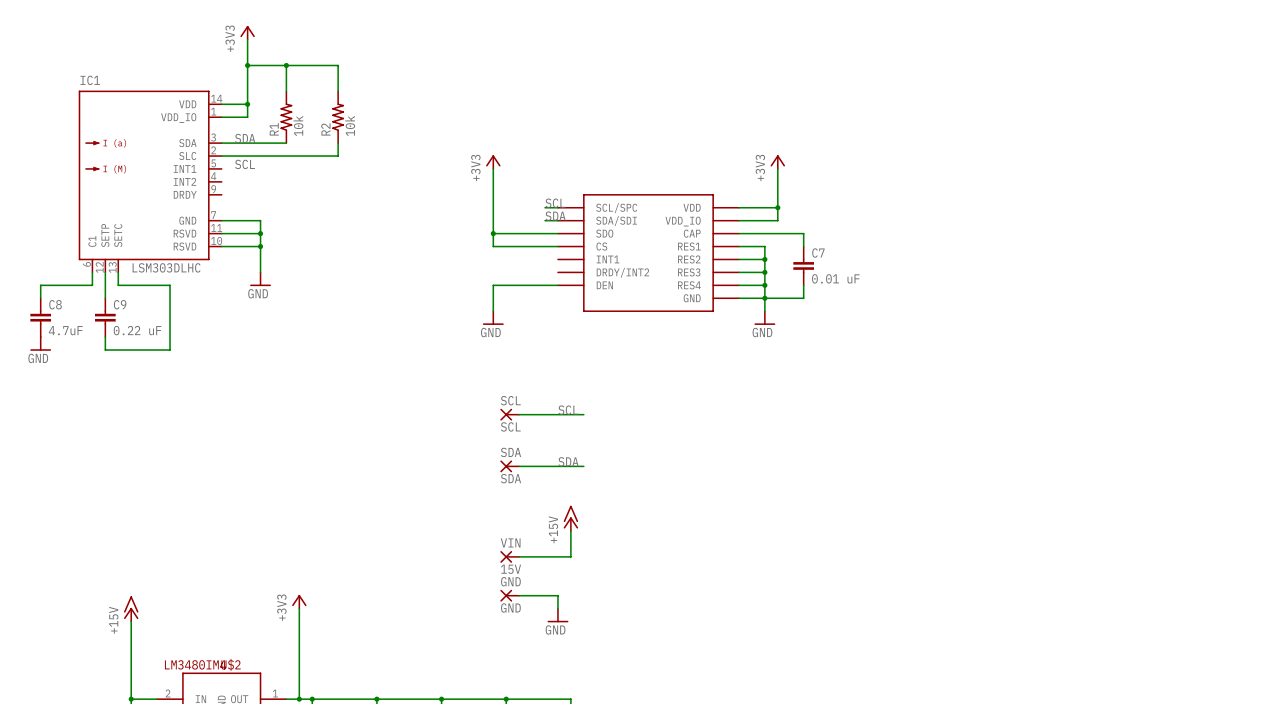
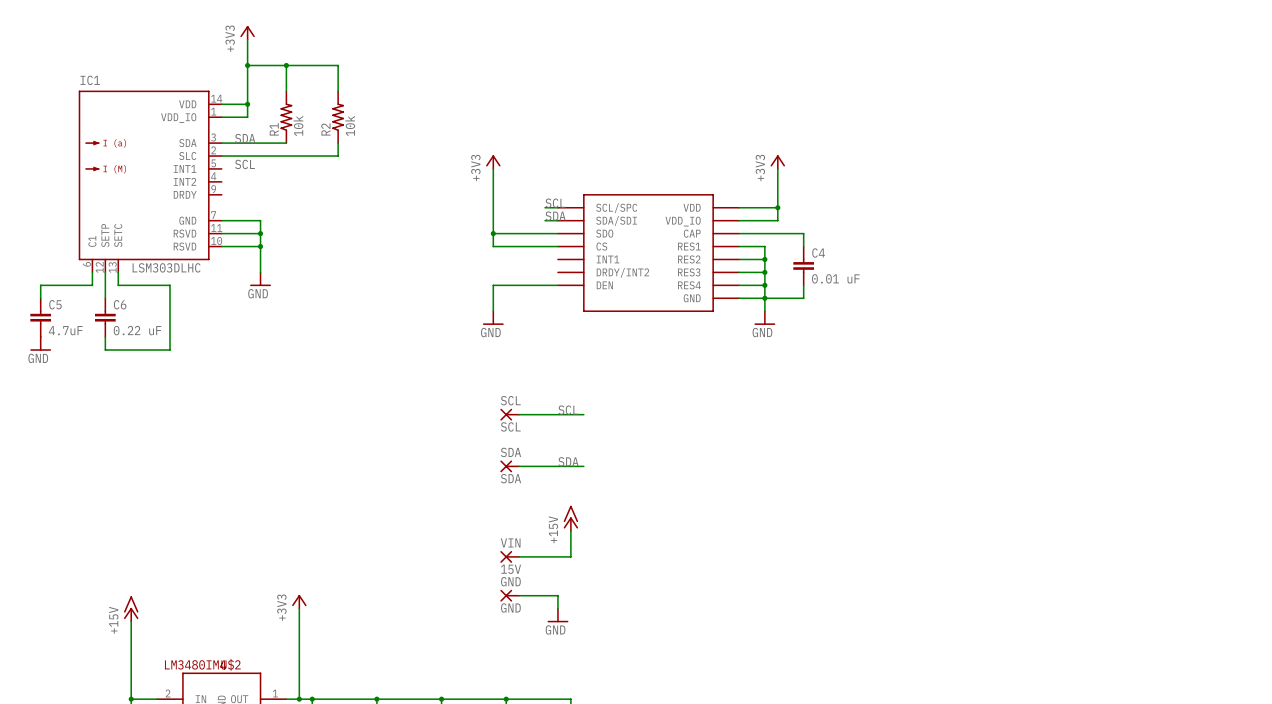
C7 name: C7 (818, 253) -> C4 (818, 253)
C8 name: C8 (55, 304) -> C5 (55, 304)
C9 name: C9 (120, 304) -> C6 (120, 304)

